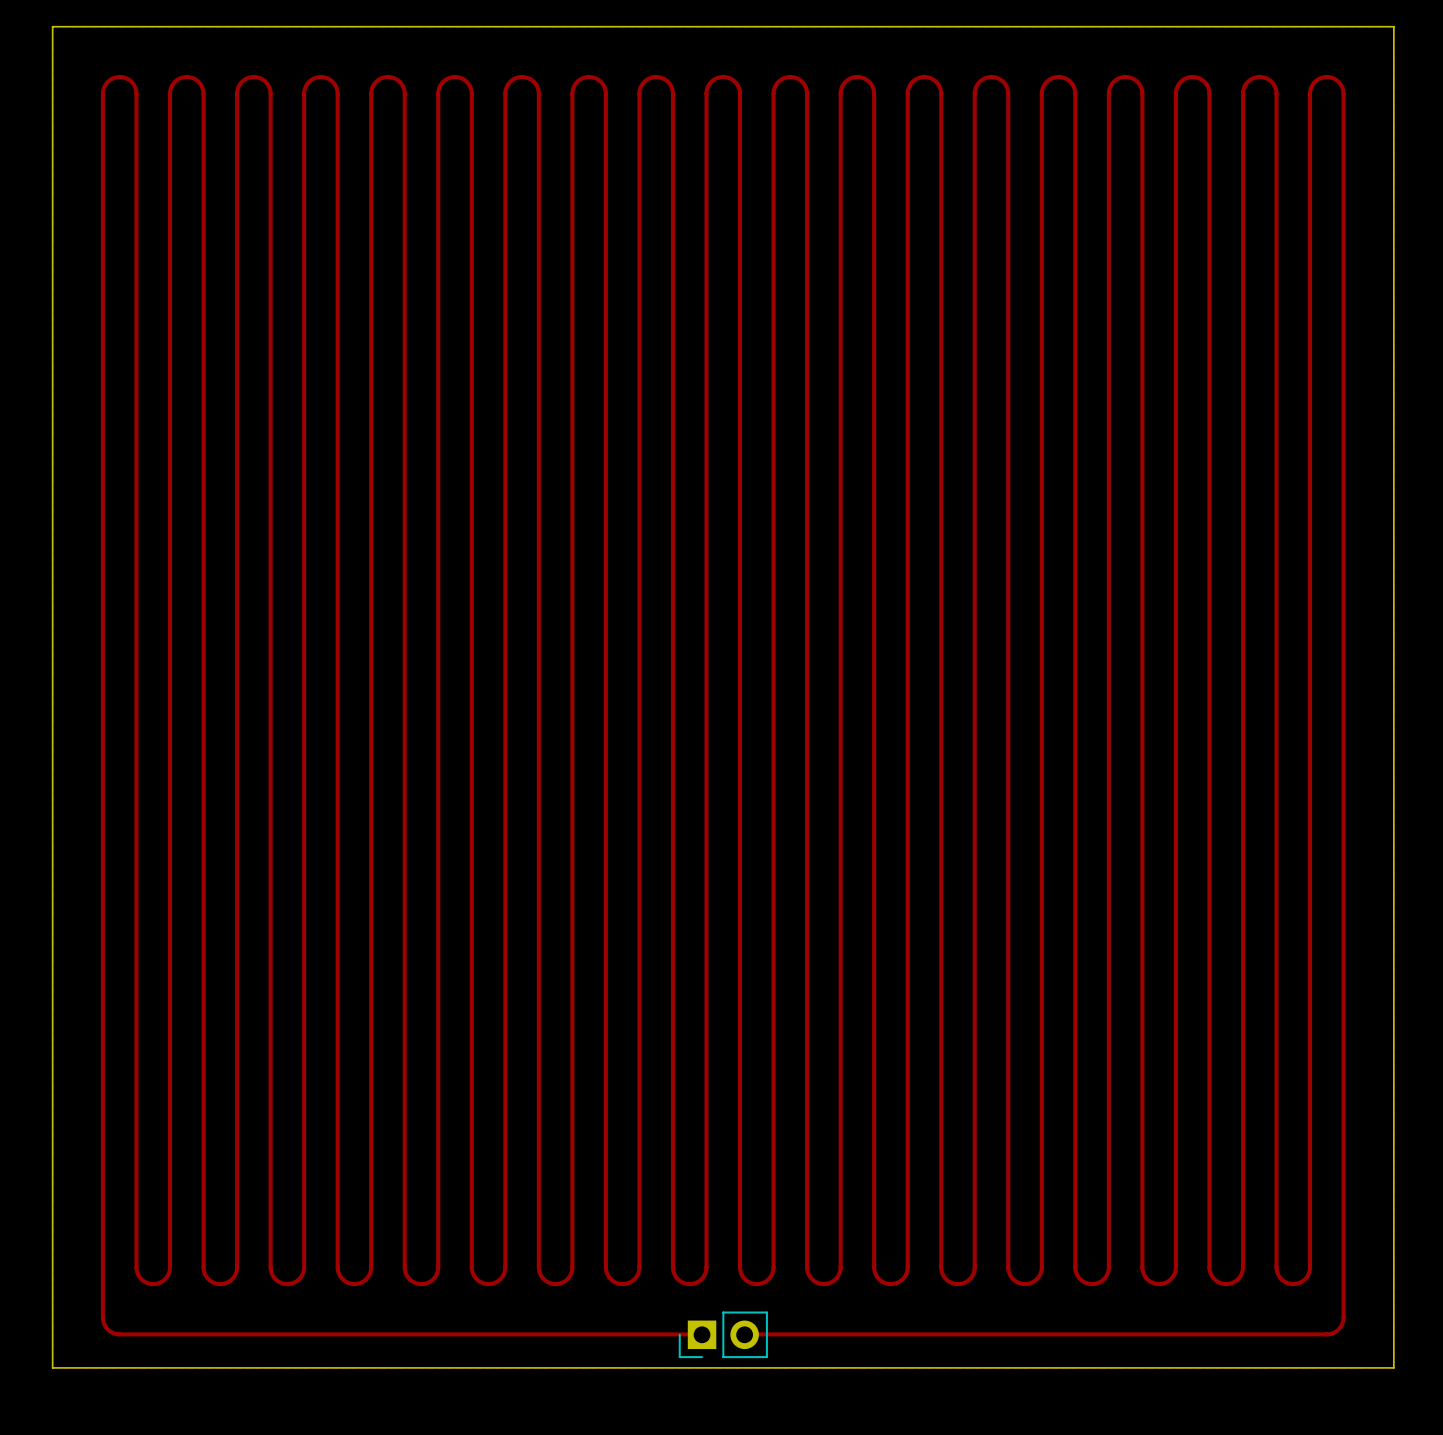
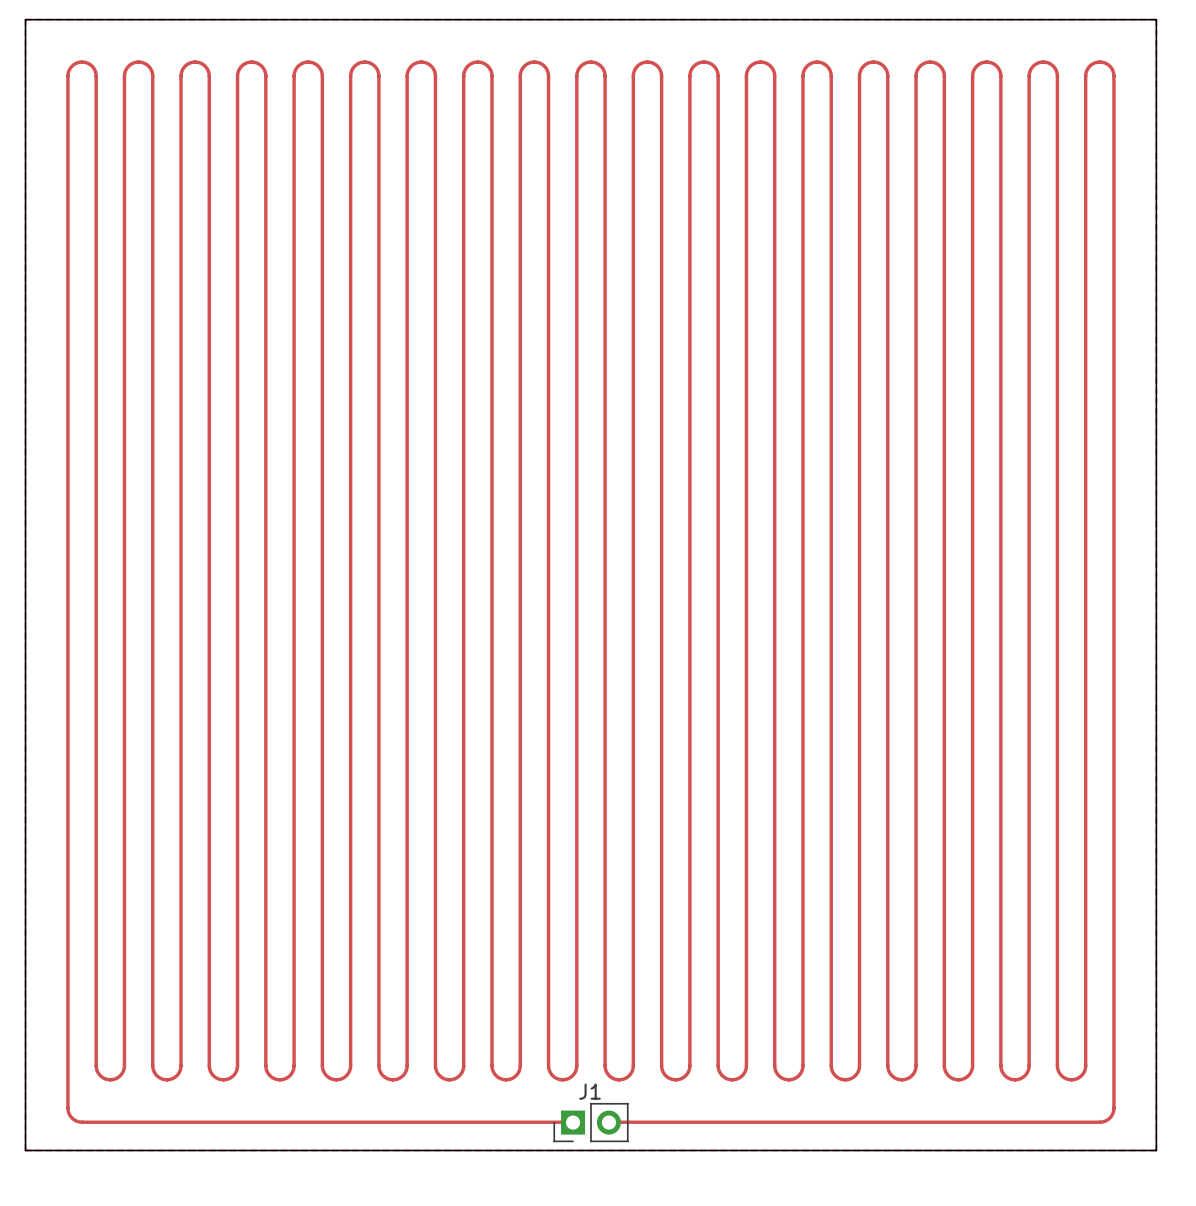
J1 name: none -> J1 (589, 1091)

